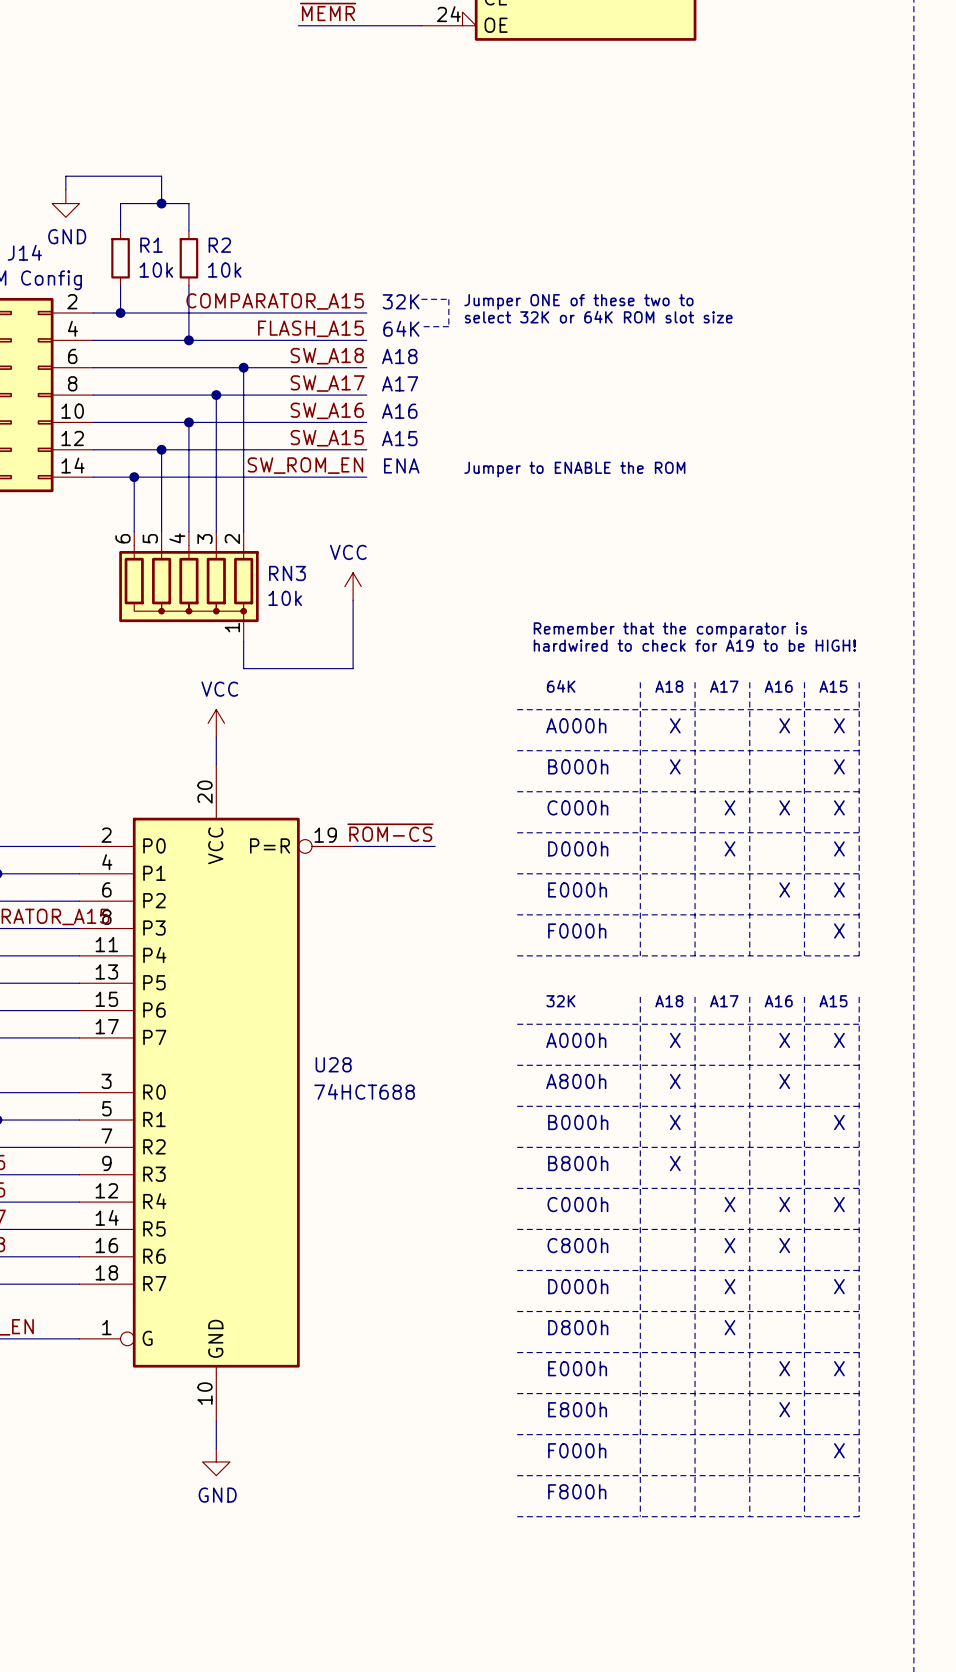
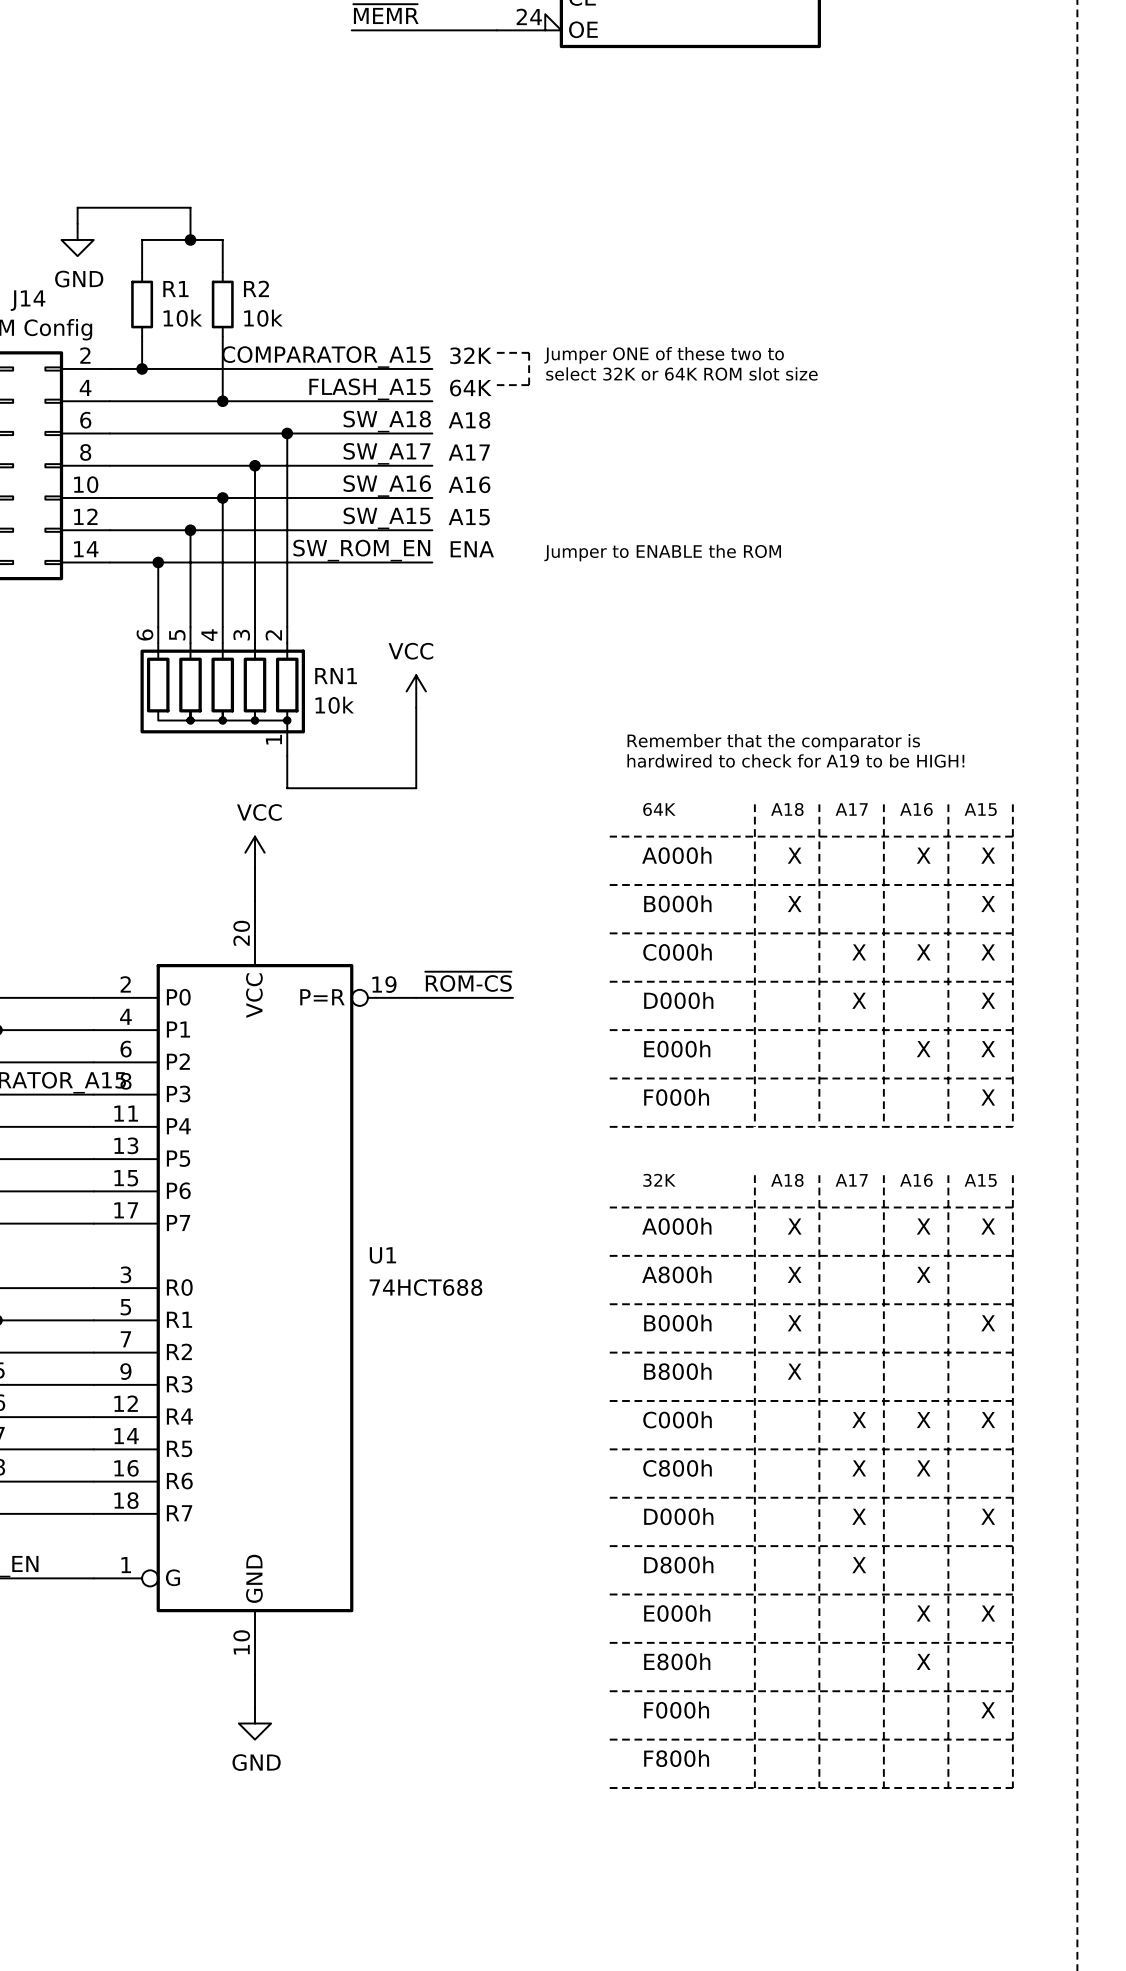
RN3 name: RN3 (287, 573) -> RN1 (336, 676)
U28 name: U28 (333, 1064) -> U1 (382, 1255)

